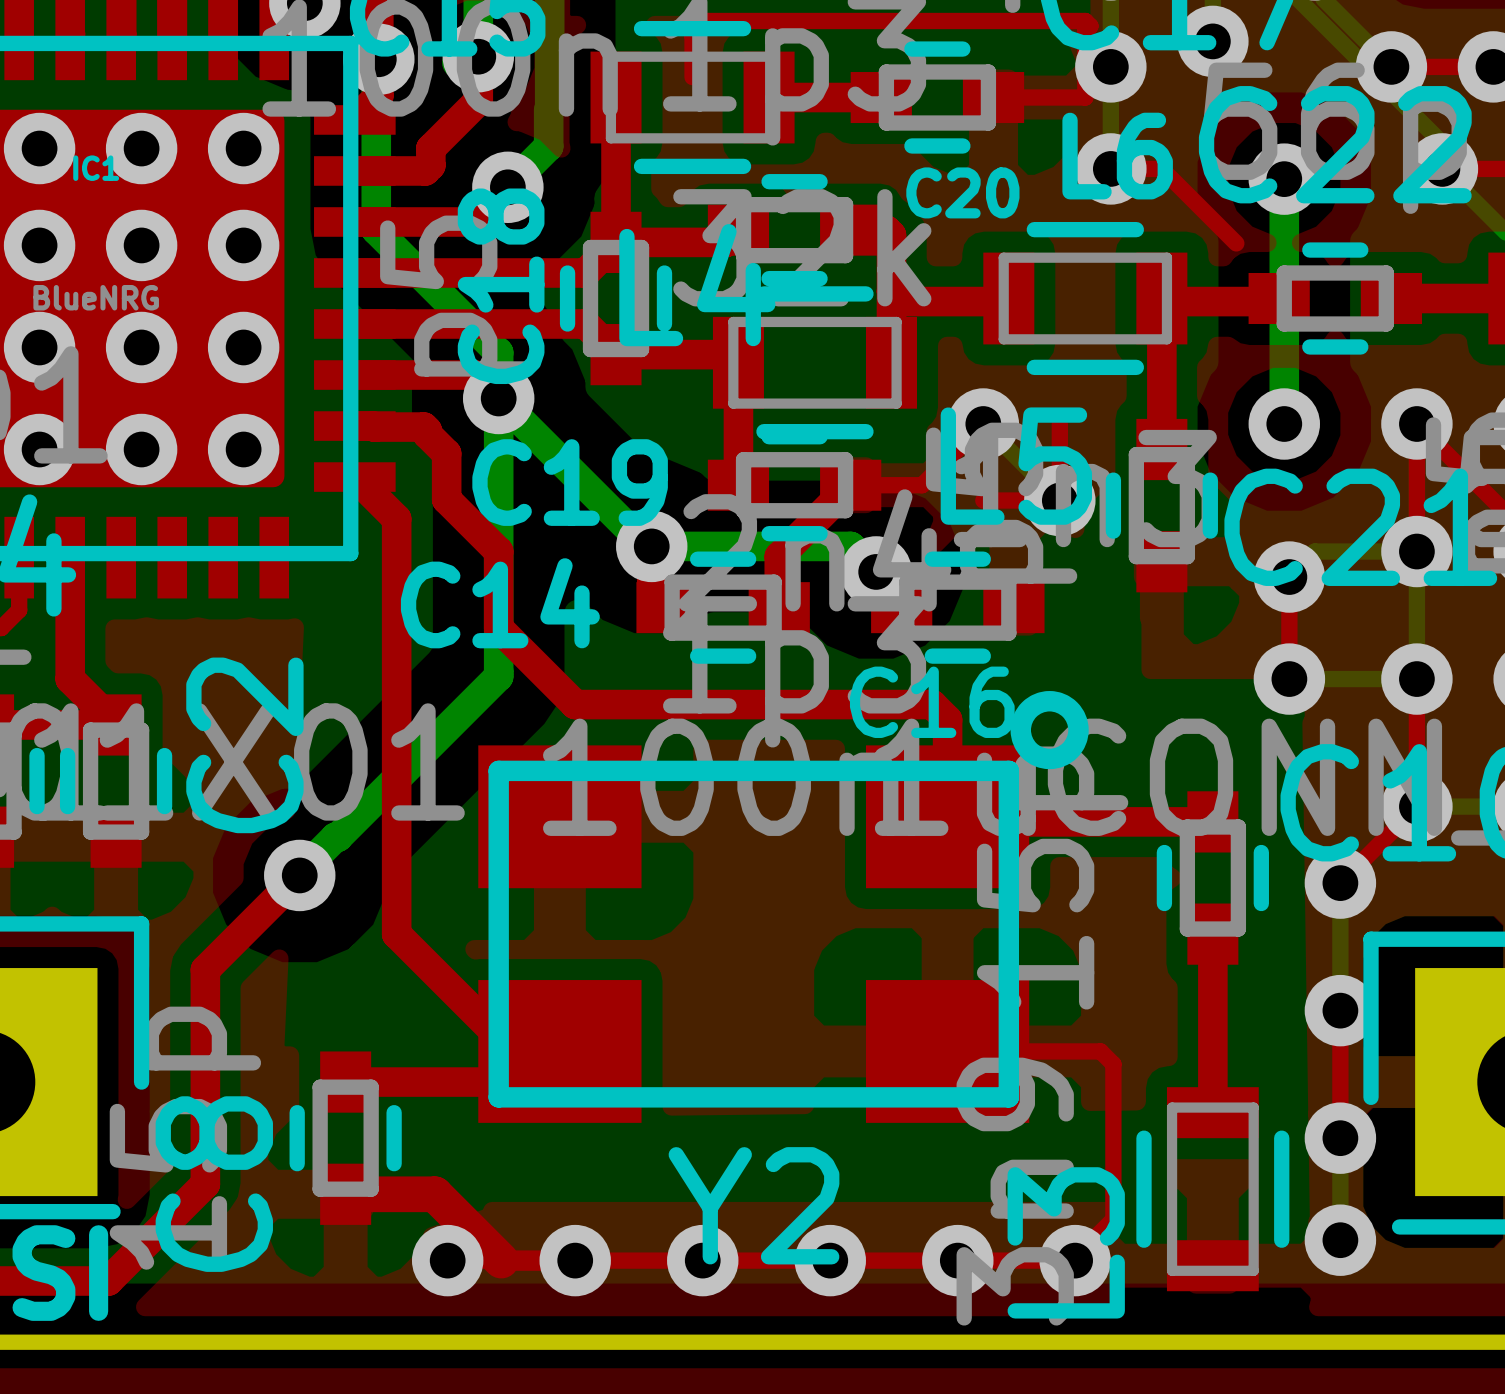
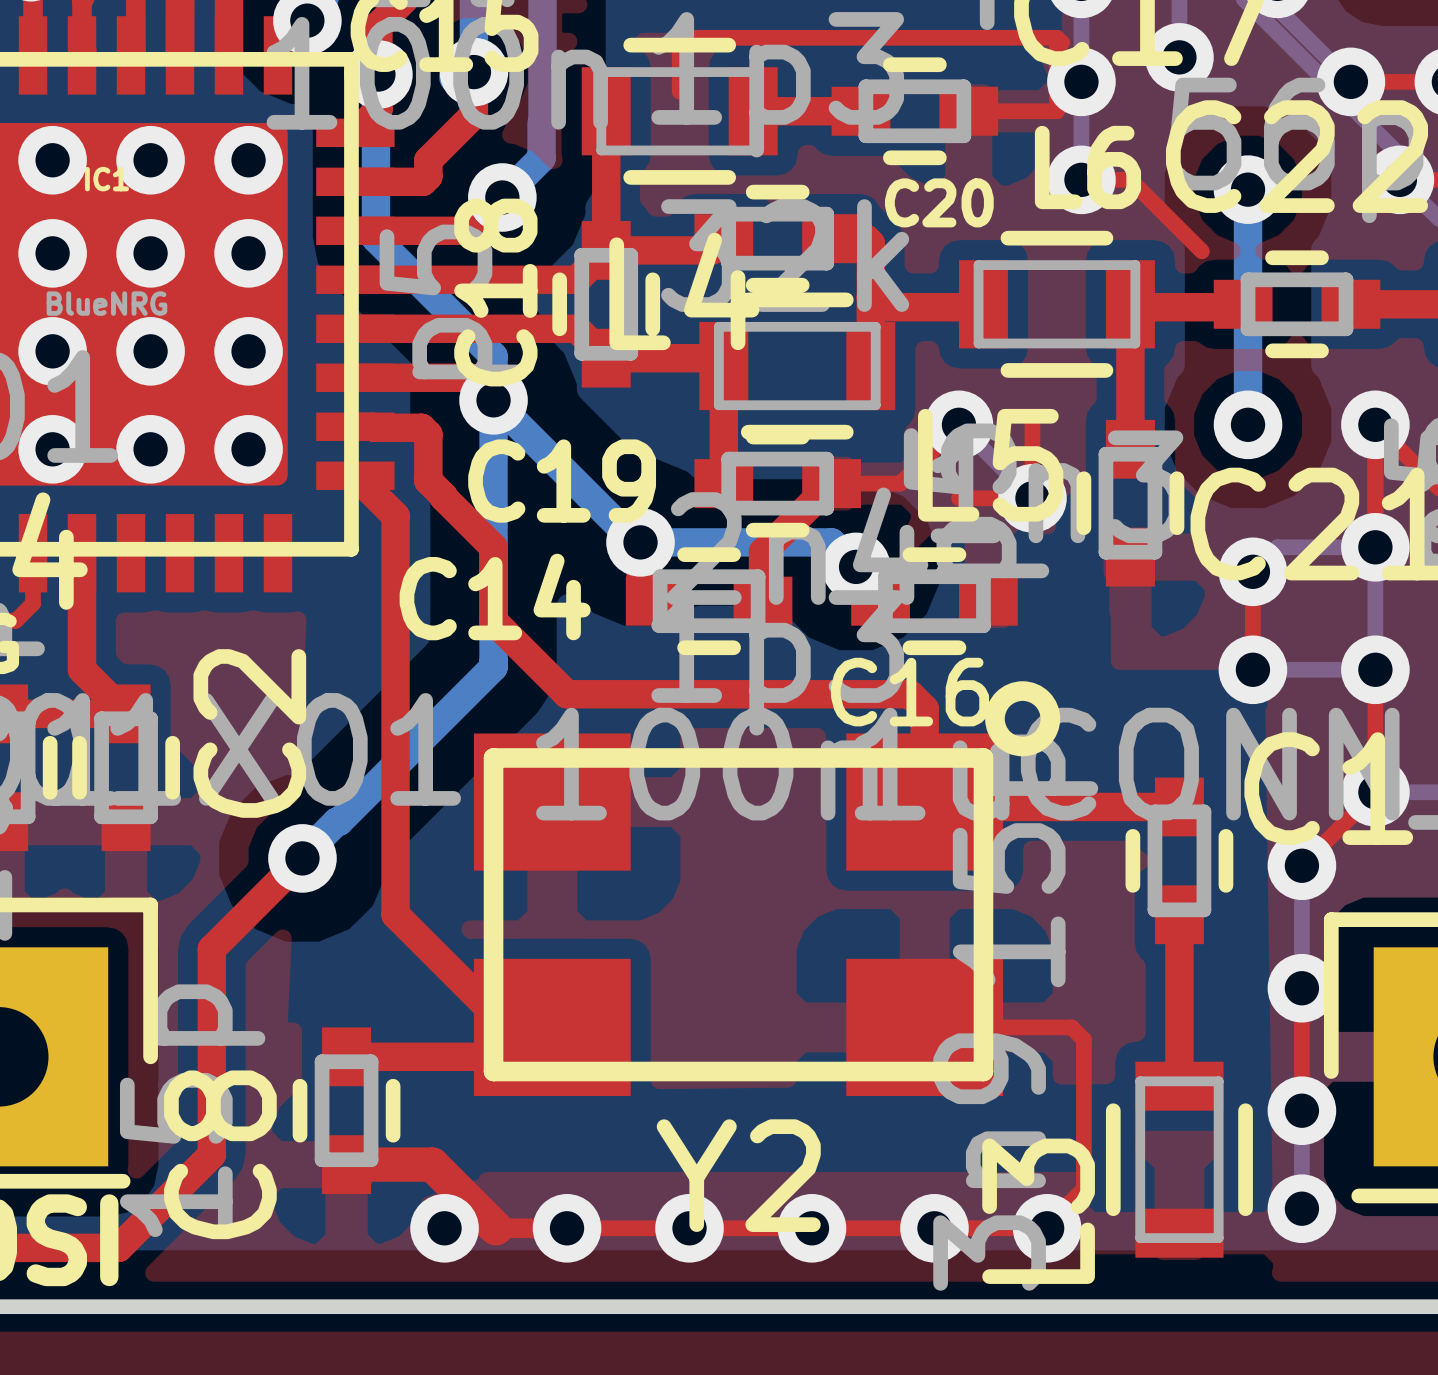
top track: (427, 430) (427, 434) (446, 453) (446, 499) -> (424, 431) (428, 434) (428, 480) (443, 496)

